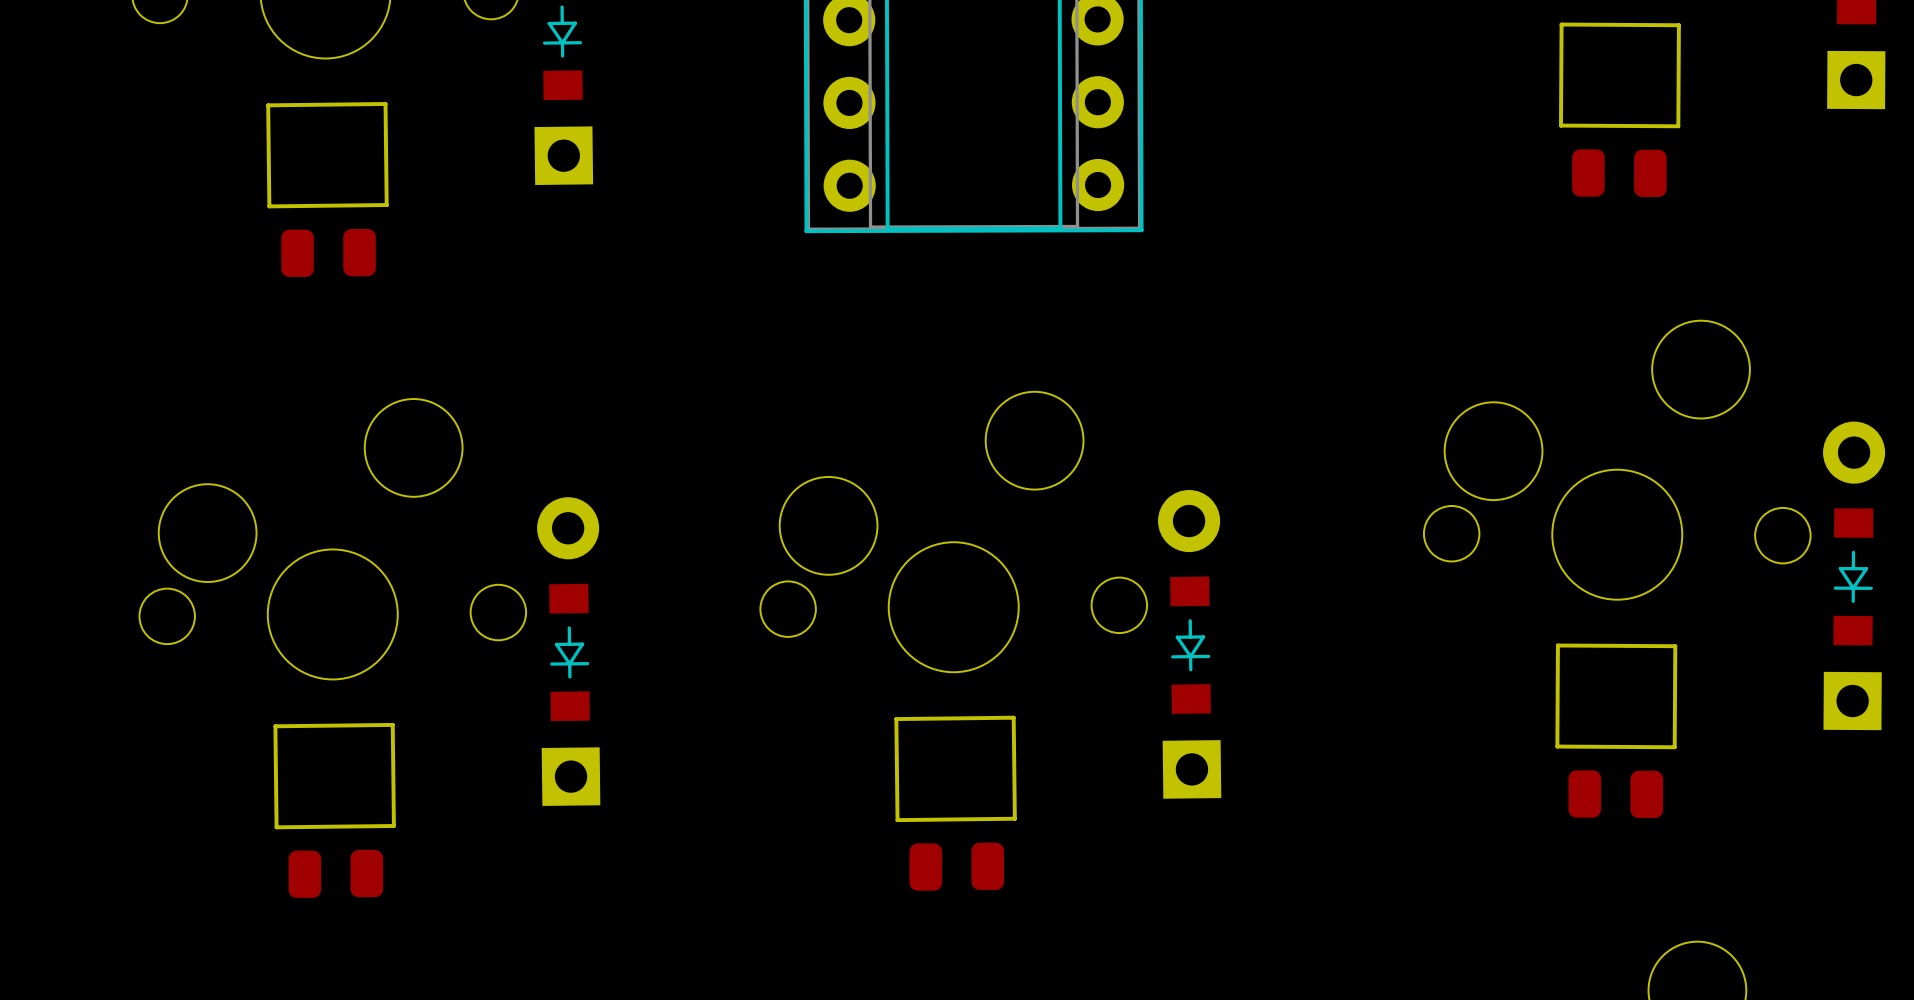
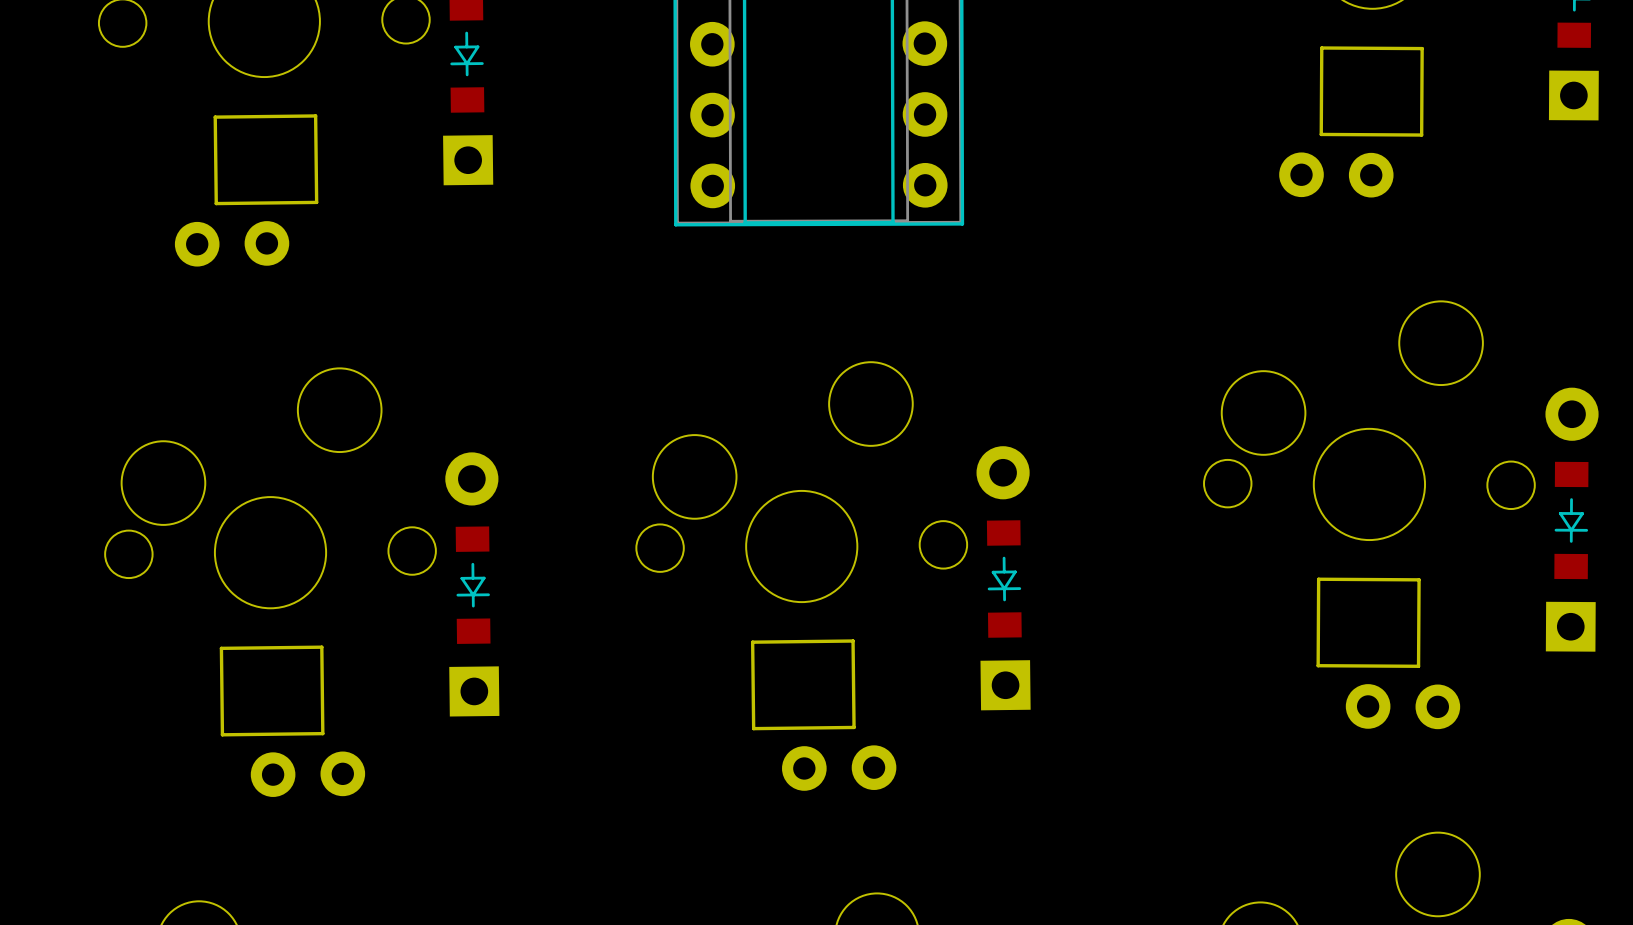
part: none -> (1336, 174)
part: (1619, 173) -> none
part: (328, 252) -> none
part: none -> (232, 243)
part: (1615, 794) -> none
part: none -> (1402, 706)
part: (956, 866) -> none
part: none -> (839, 768)
part: (335, 873) -> none
part: none -> (307, 774)

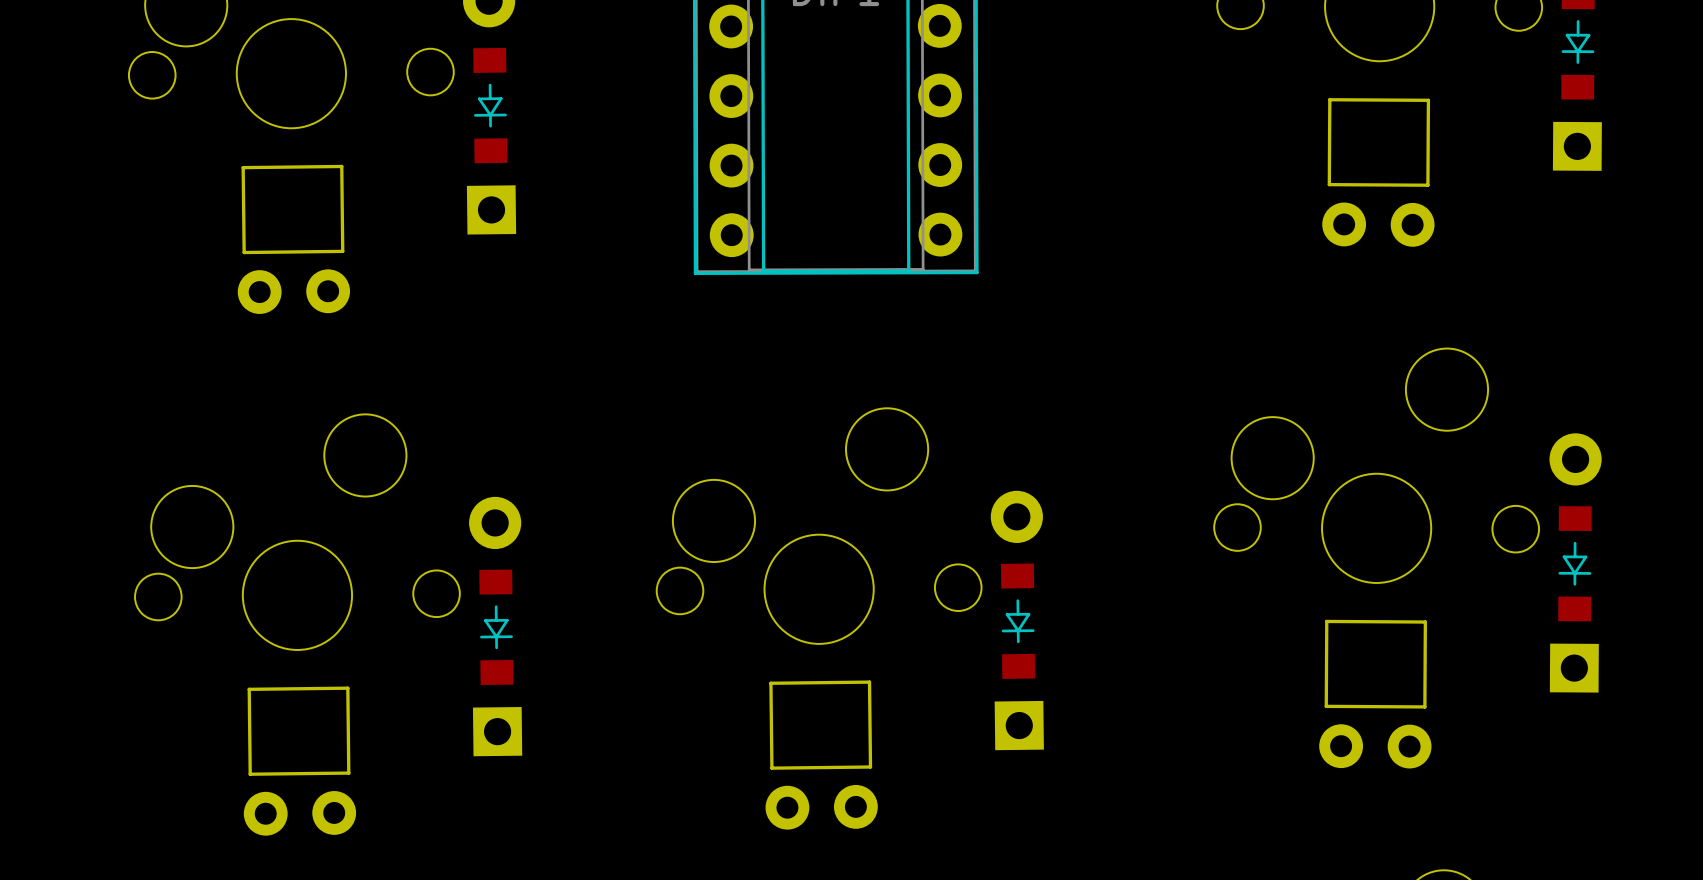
part position: (1336, 174) -> (1378, 224)
part position: (232, 243) -> (293, 291)
part position: (1402, 706) -> (1375, 746)
part position: (839, 768) -> (821, 807)
part position: (307, 774) -> (299, 813)

